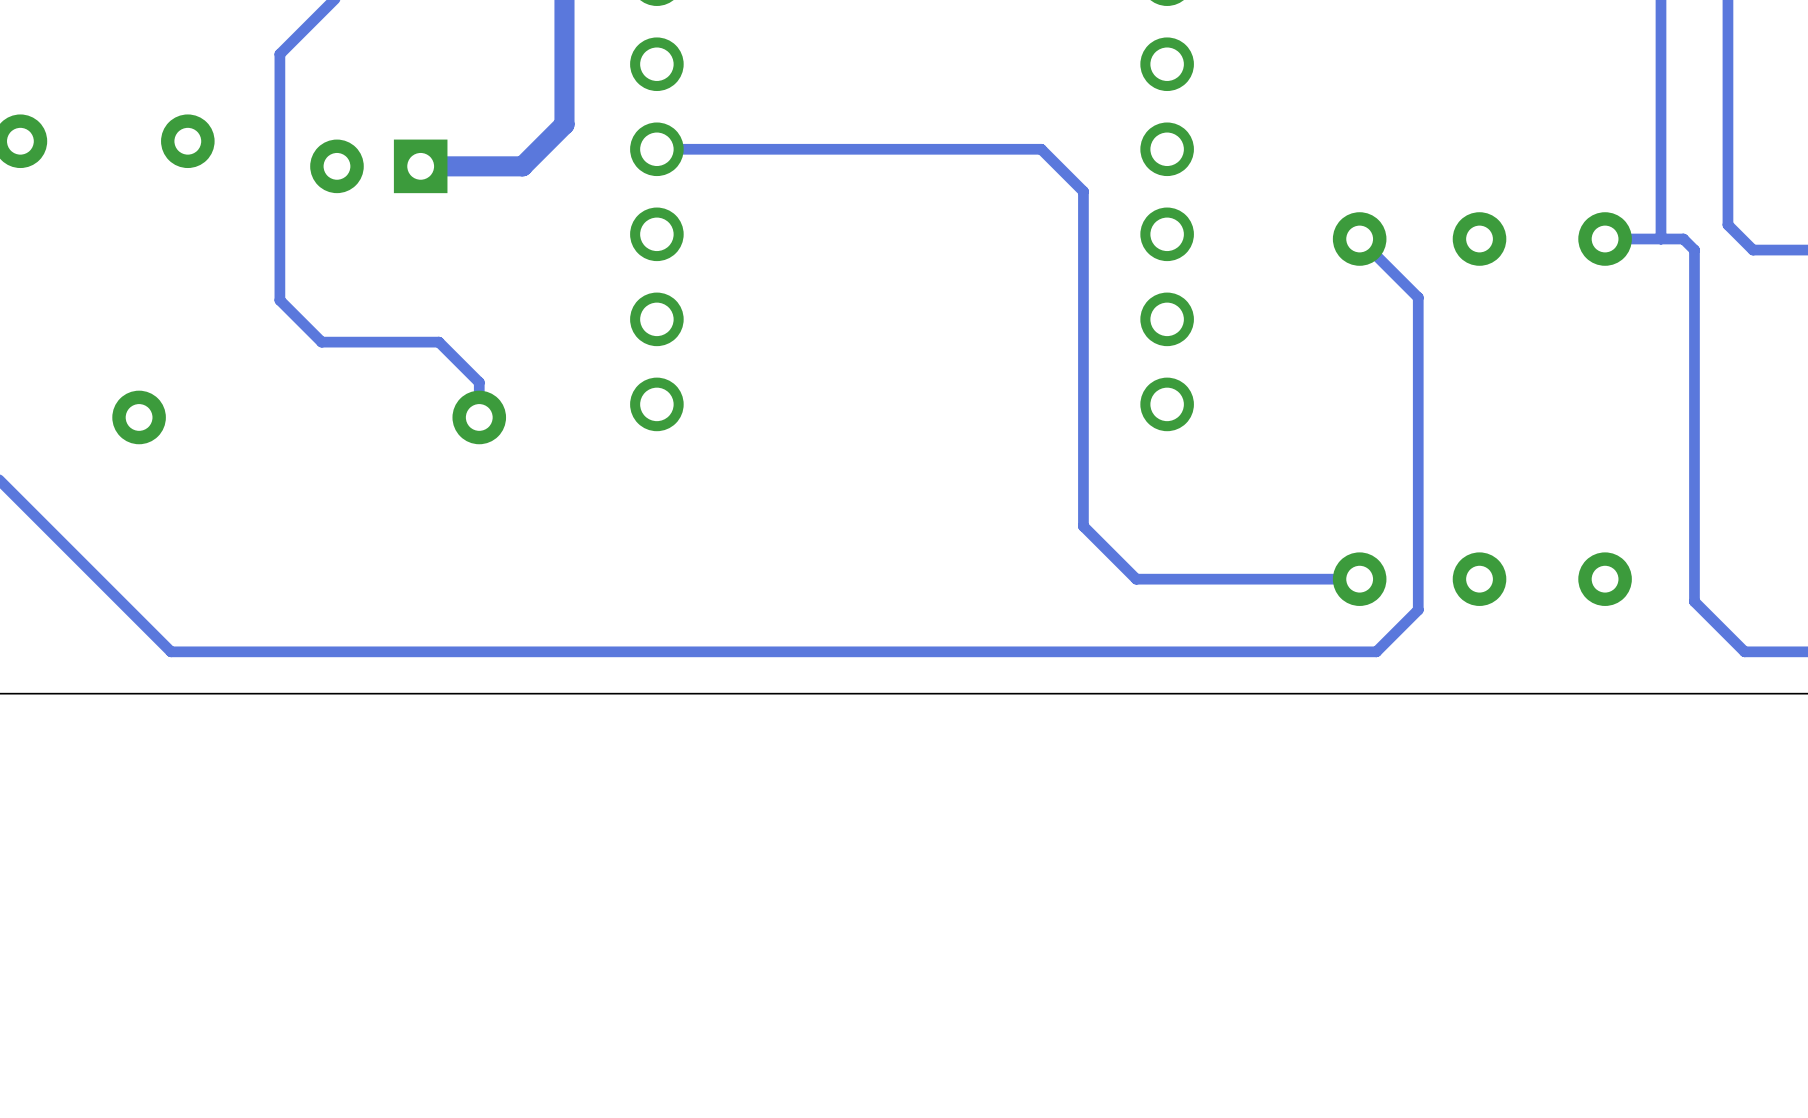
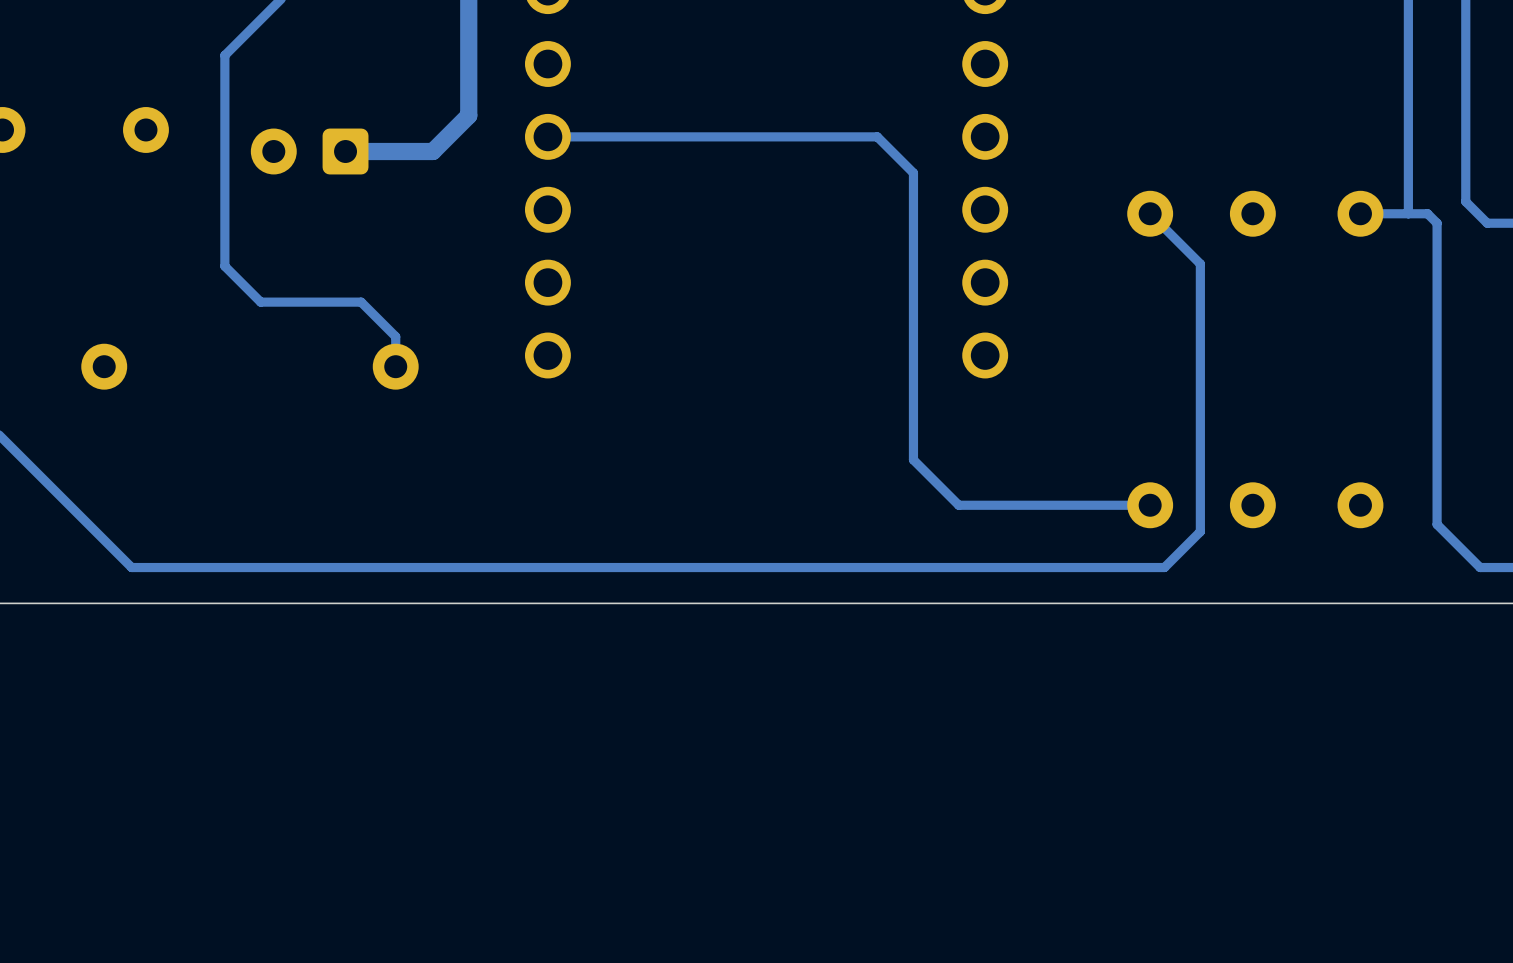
part footprint: [310, 139, 448, 194] -> [250, 128, 369, 175]

